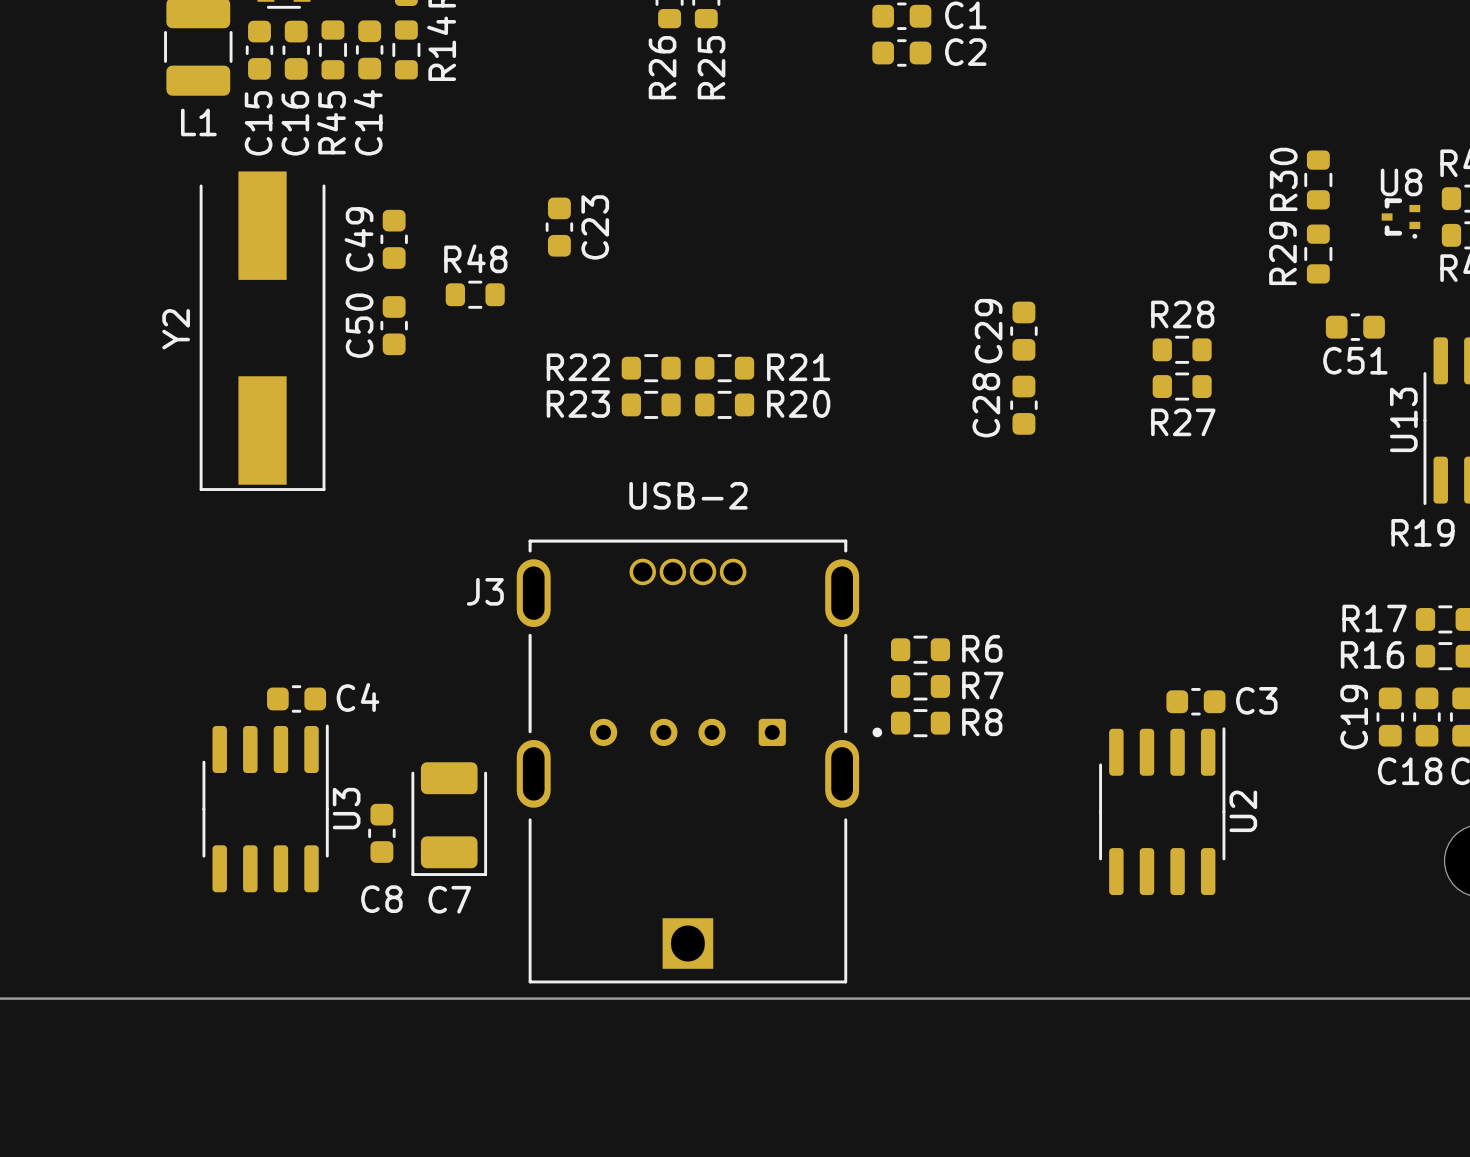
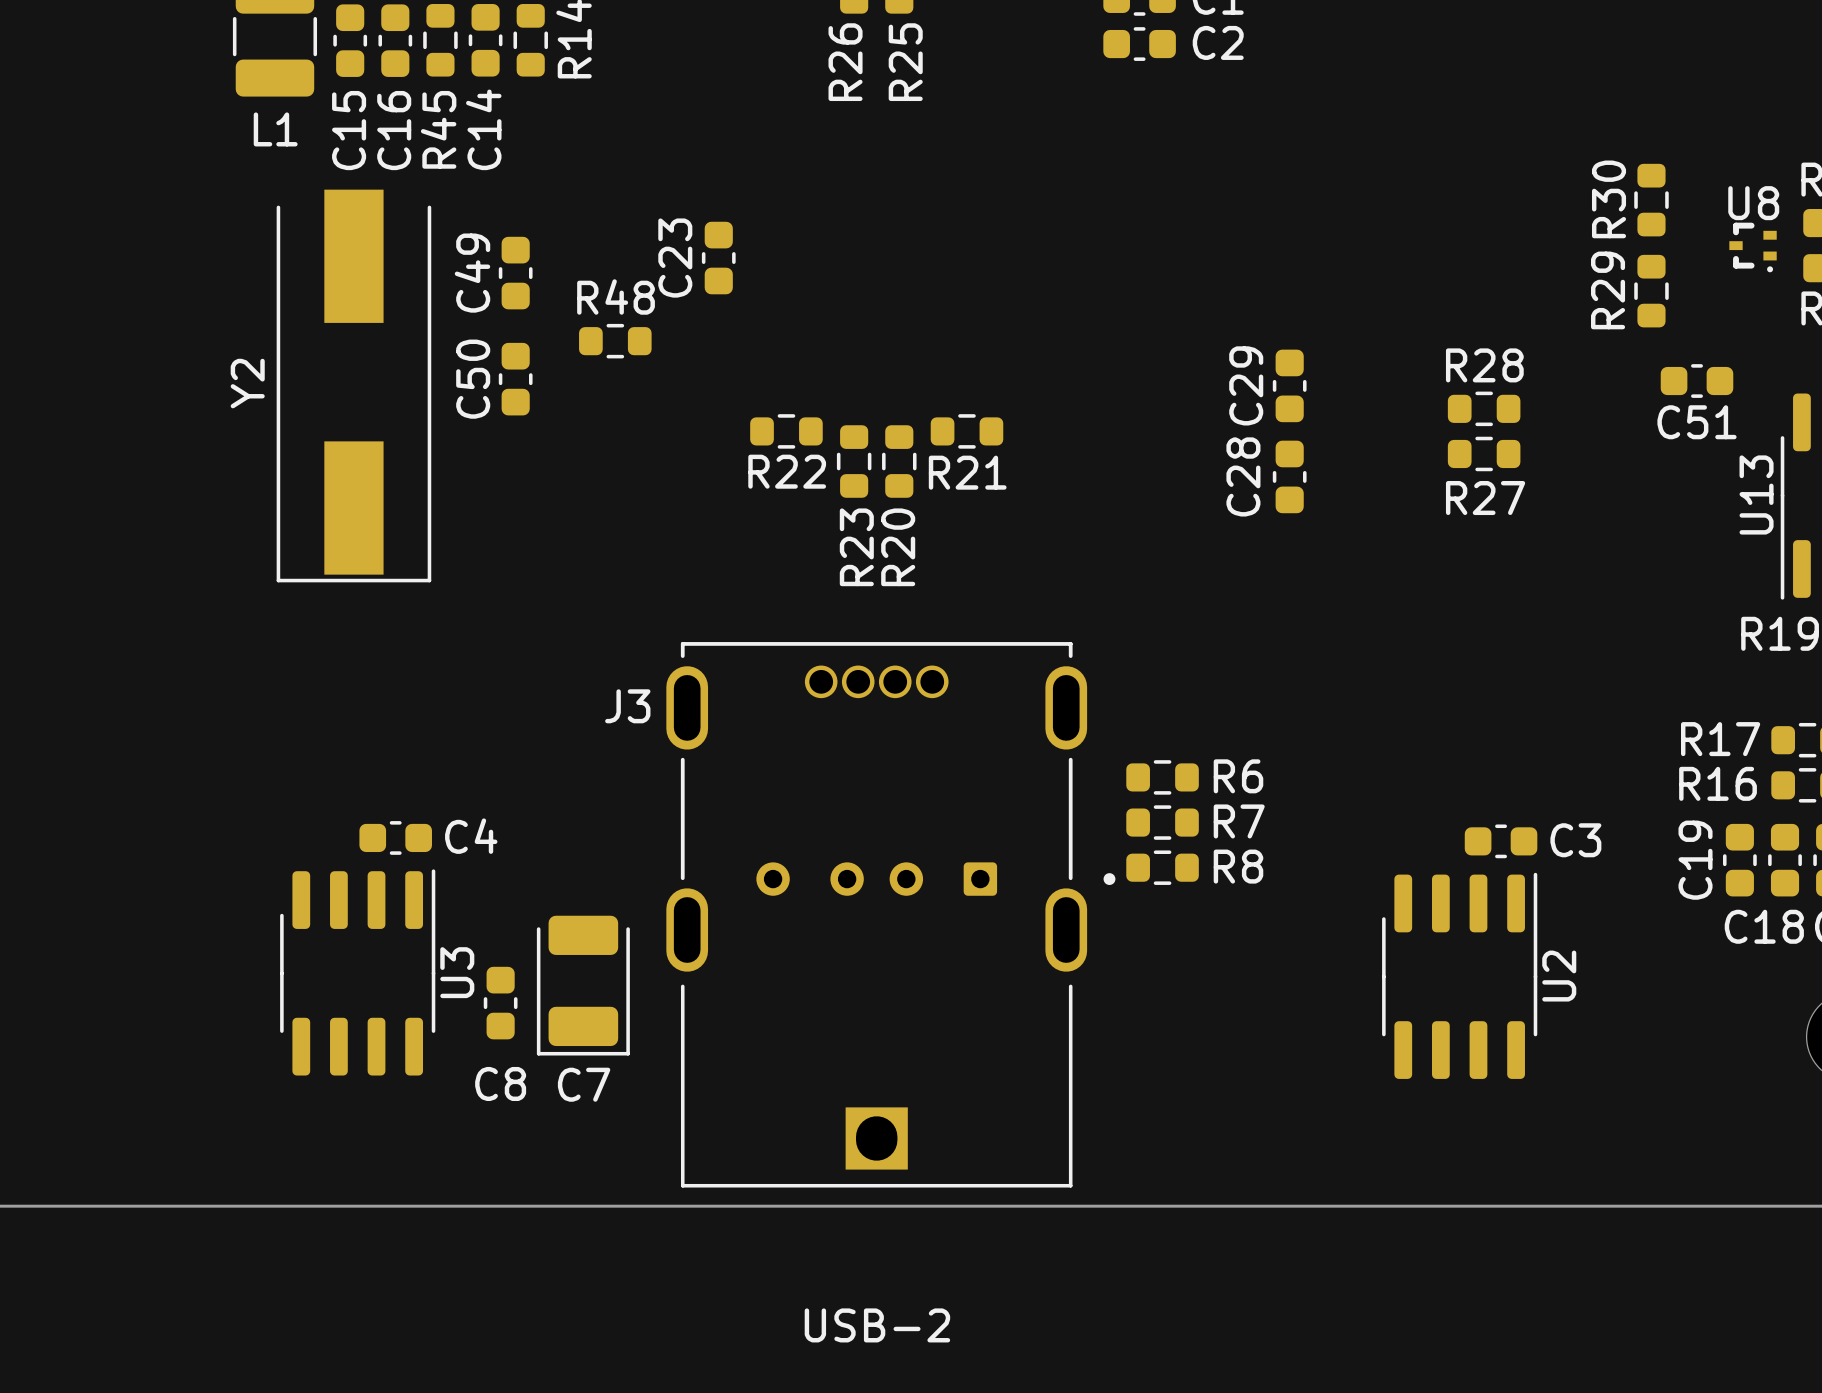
C23 name position: C23 (595, 227) -> C23 (675, 258)
R22 name position: R22 (578, 367) -> R22 (787, 471)
R21 name position: R21 (798, 367) -> R21 (967, 472)
R22 position: (651, 368) -> (786, 431)
R21 position: (724, 368) -> (966, 431)
R23 name position: R23 (578, 404) -> R23 (856, 547)
R23 rotation: 0° (651, 404) -> 90° clockwise (854, 461)
R20 rotation: 0° (724, 404) -> 90° clockwise (899, 461)
text position: USB-2 (688, 495) -> USB-2 (877, 1325)

